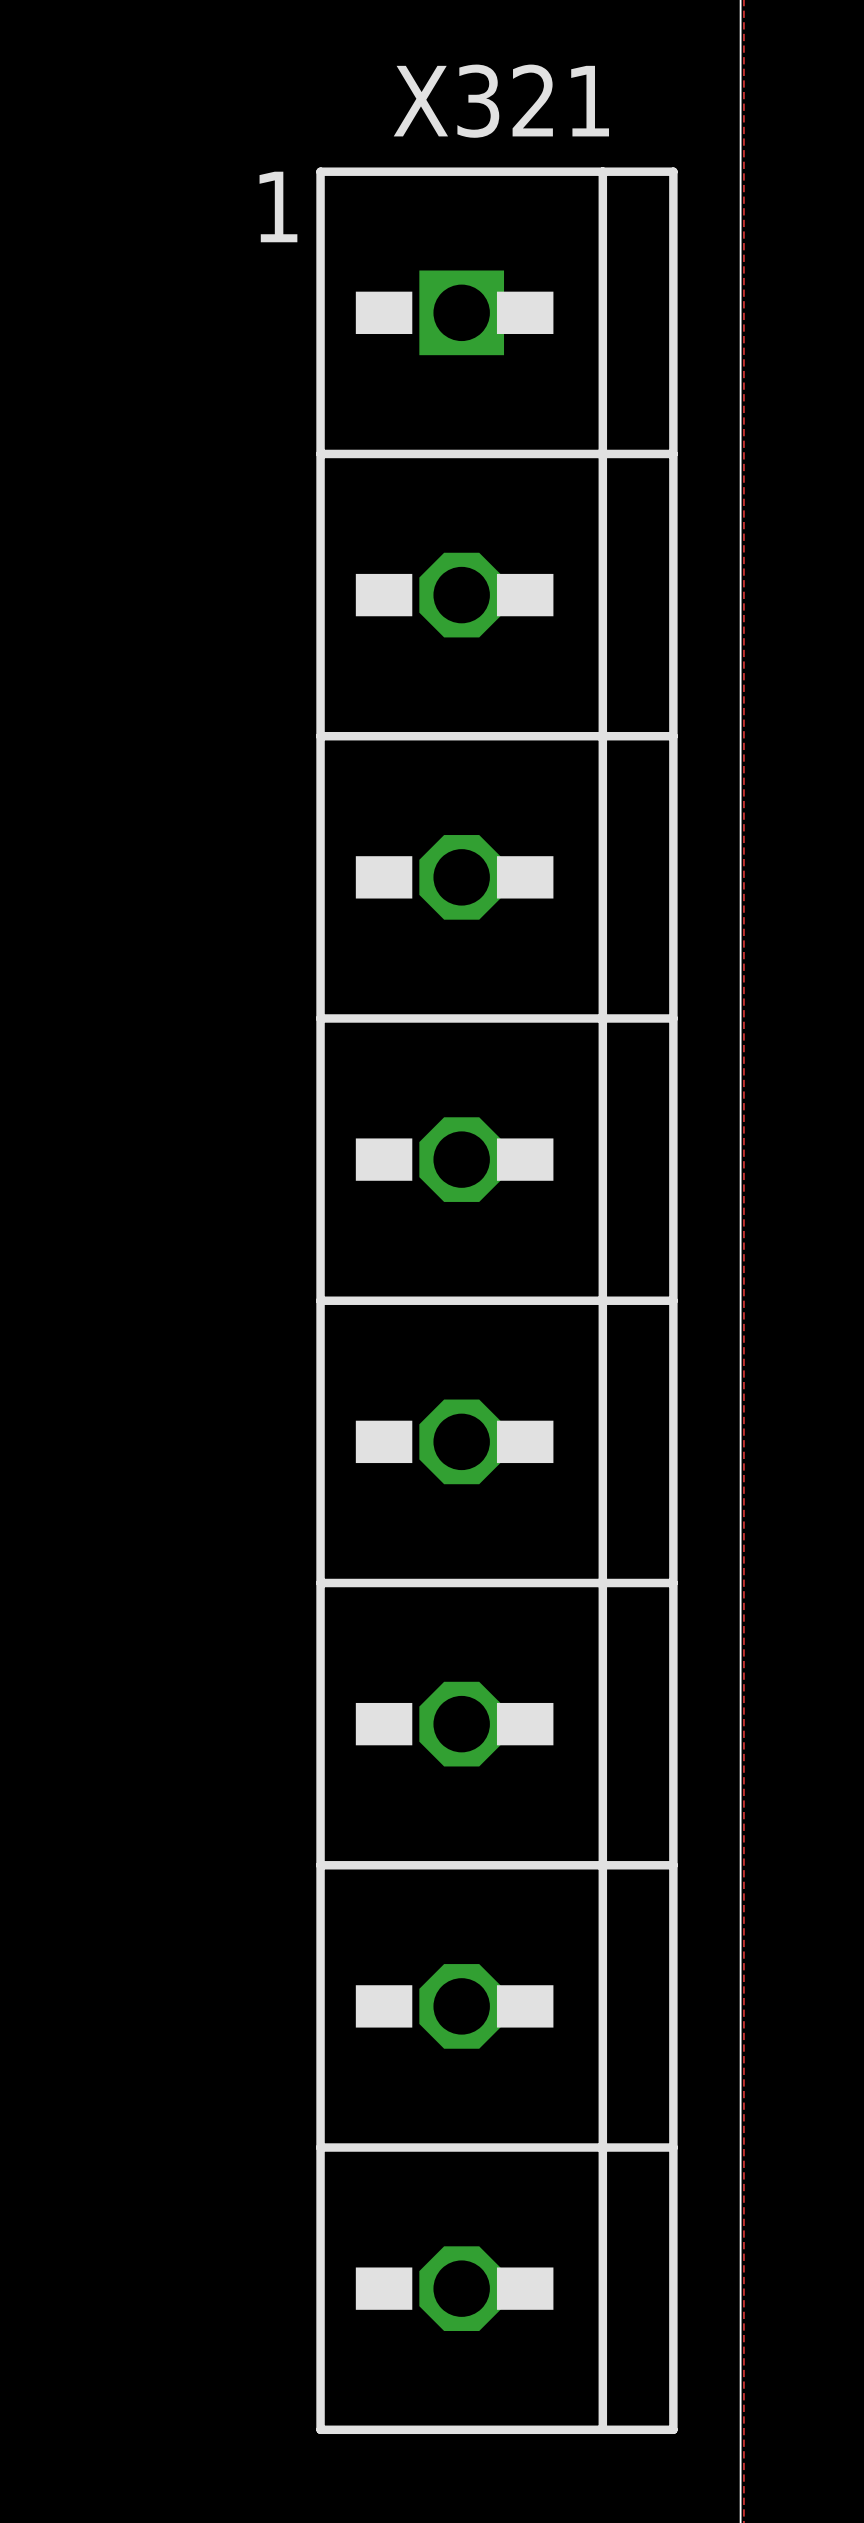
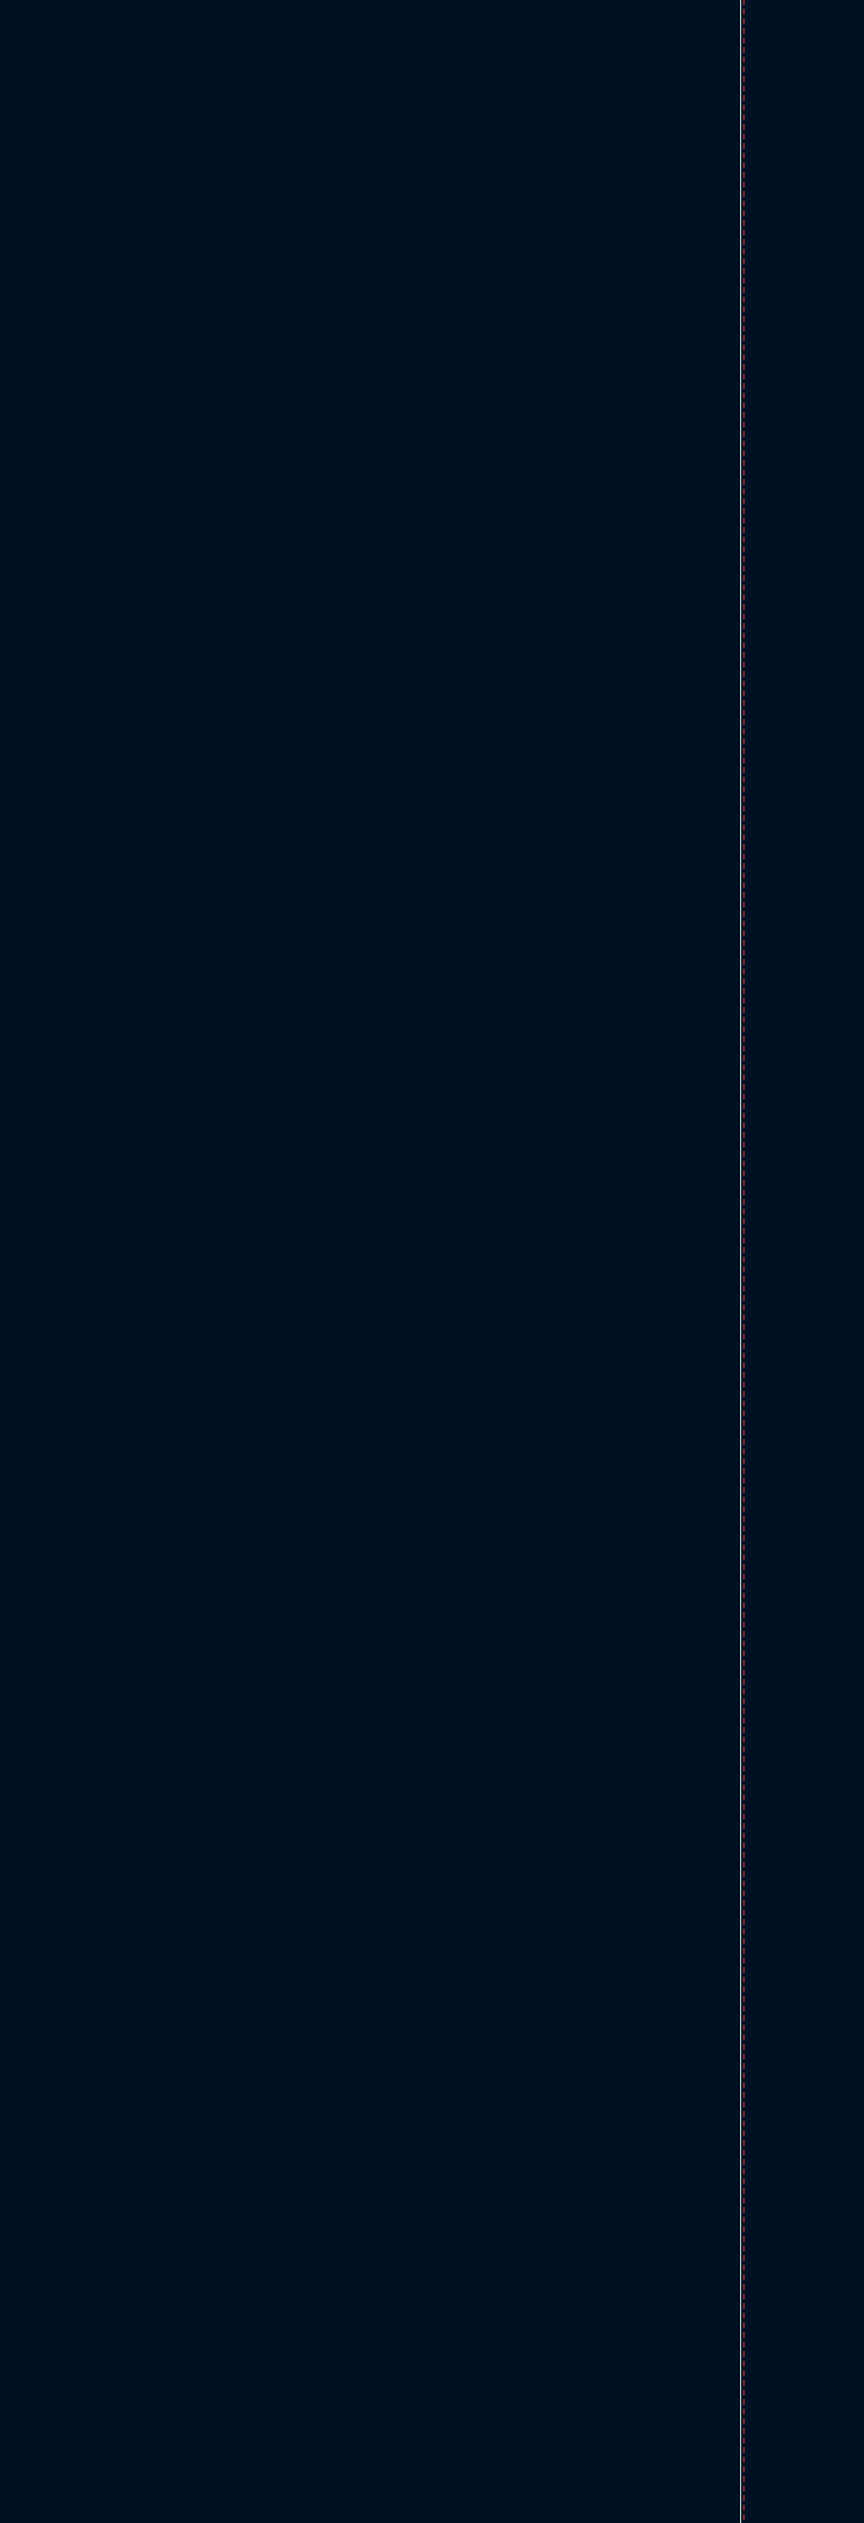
X321: (496, 1300) -> none

